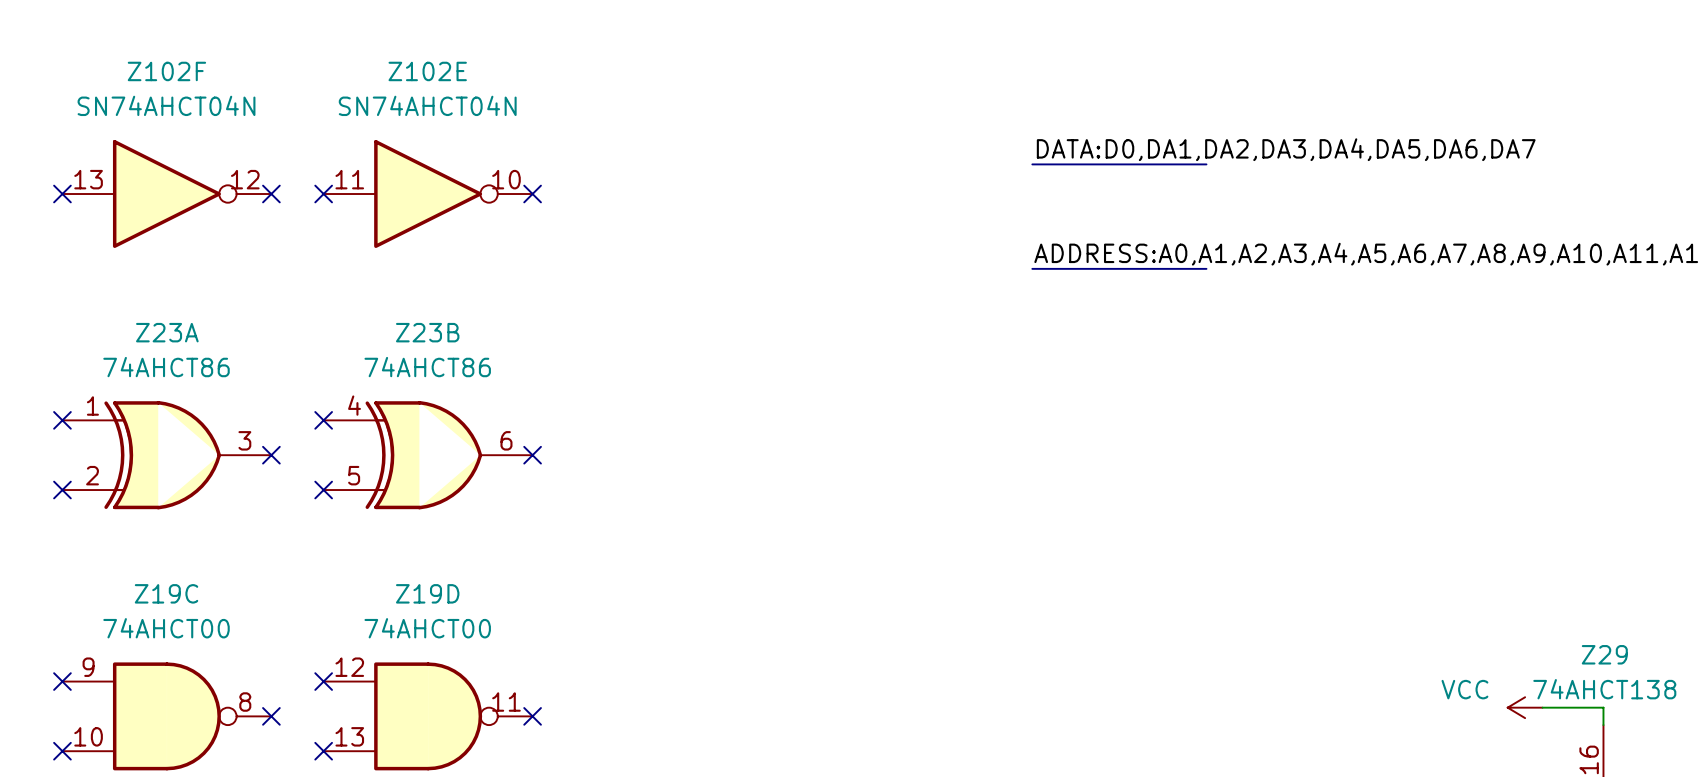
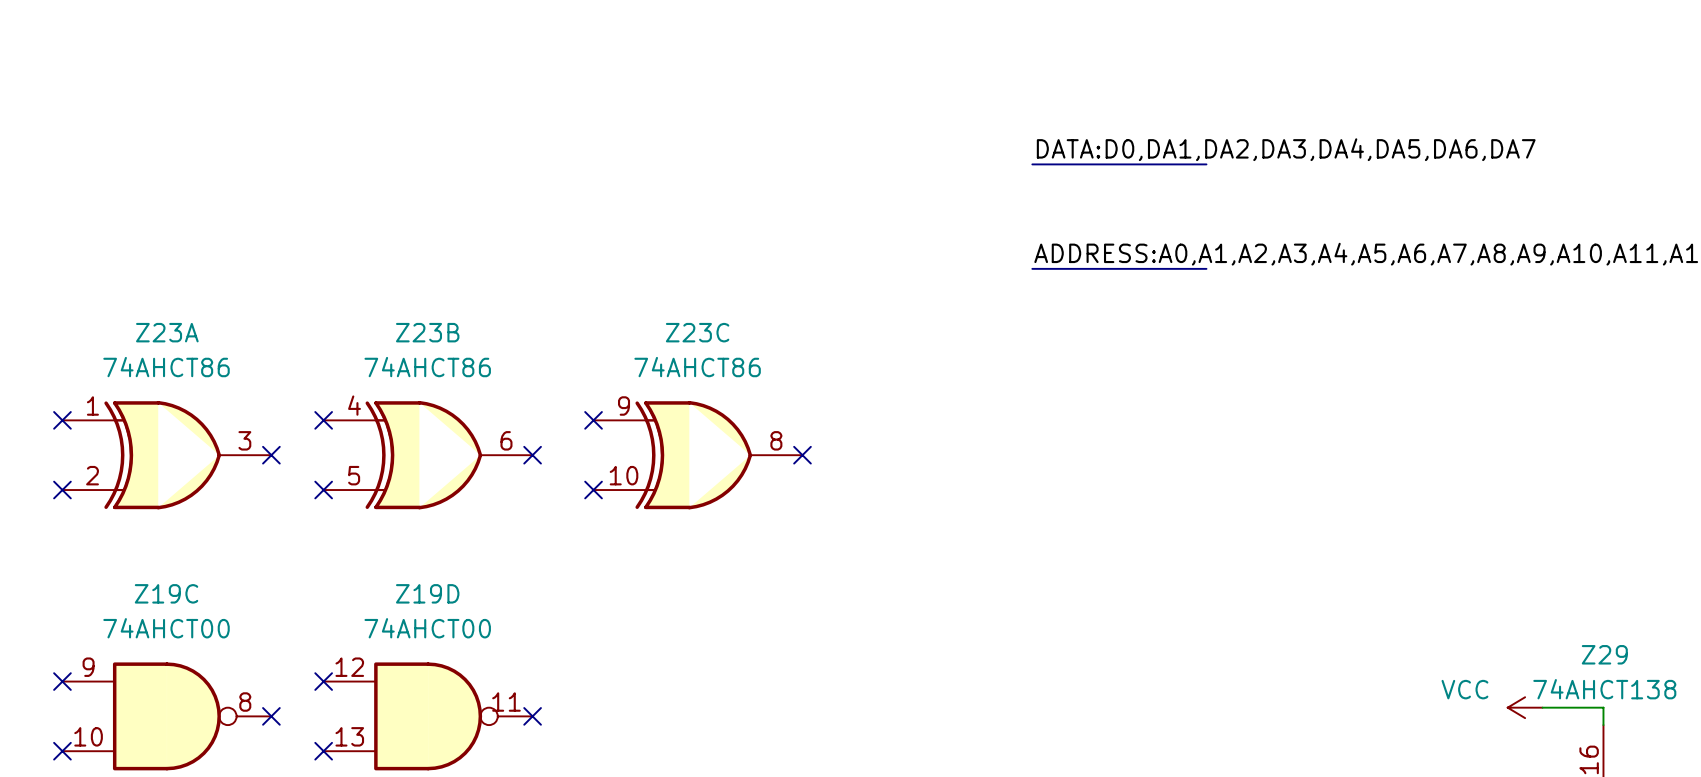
no-connect mark: (62, 194) -> none
Z102F: SN74AHCT04N (166, 194) -> none
no-connect mark: (271, 194) -> none
no-connect mark: (323, 194) -> none
Z102E: SN74AHCT04N (428, 194) -> none
no-connect mark: (532, 194) -> none
no-connect mark: none -> (593, 420)
Z23C: none -> 74AHCT86 (698, 455)
no-connect mark: none -> (802, 455)
no-connect mark: none -> (593, 490)

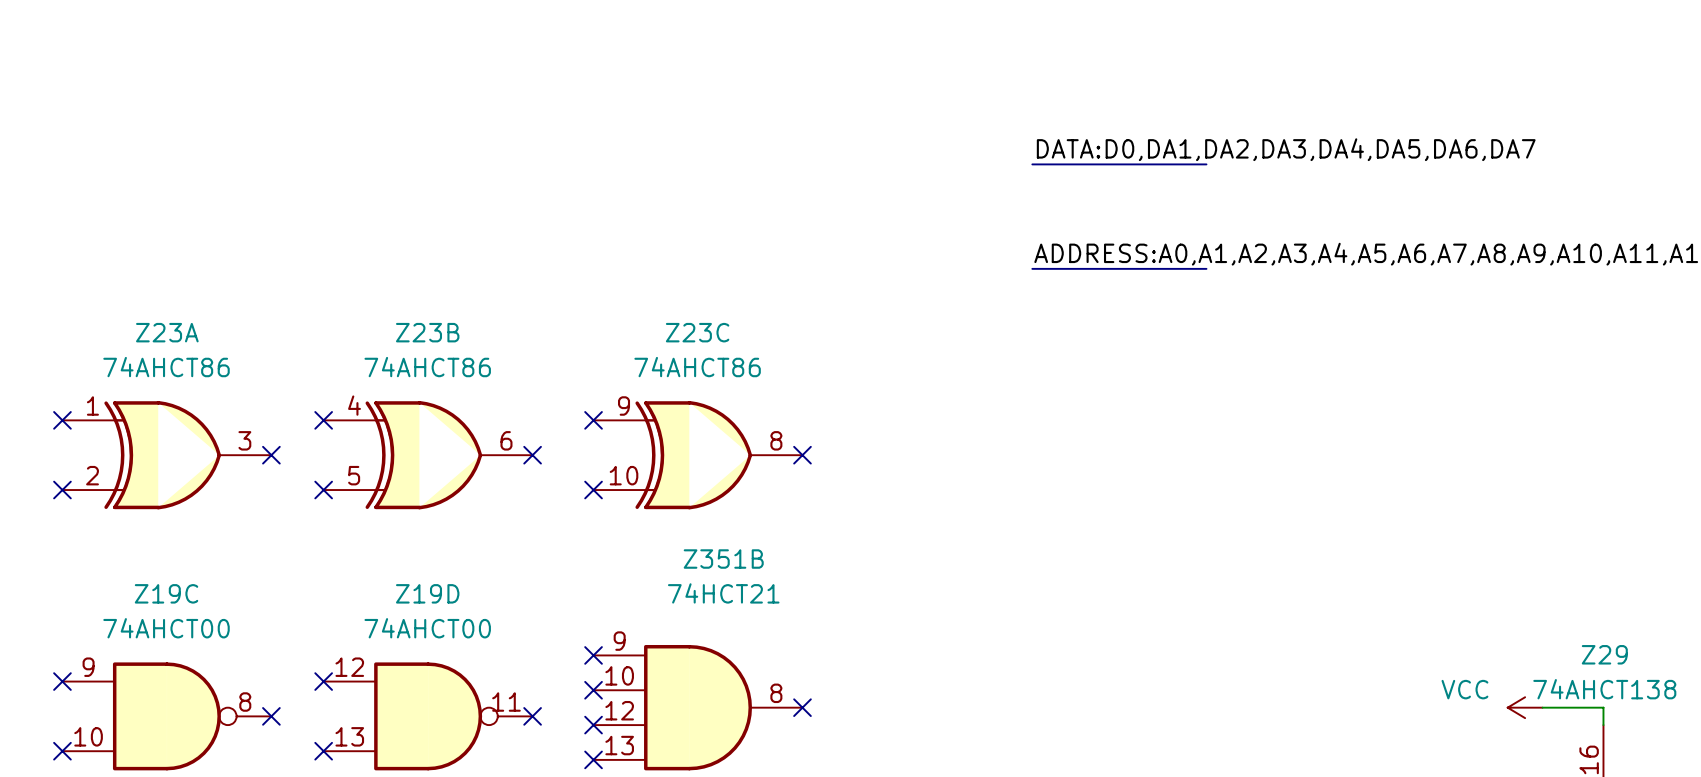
no-connect mark: none -> (593, 655)
no-connect mark: none -> (593, 690)
Z351B: none -> 74HCT21 (698, 707)
no-connect mark: none -> (802, 707)
no-connect mark: none -> (593, 725)
no-connect mark: none -> (593, 759)

